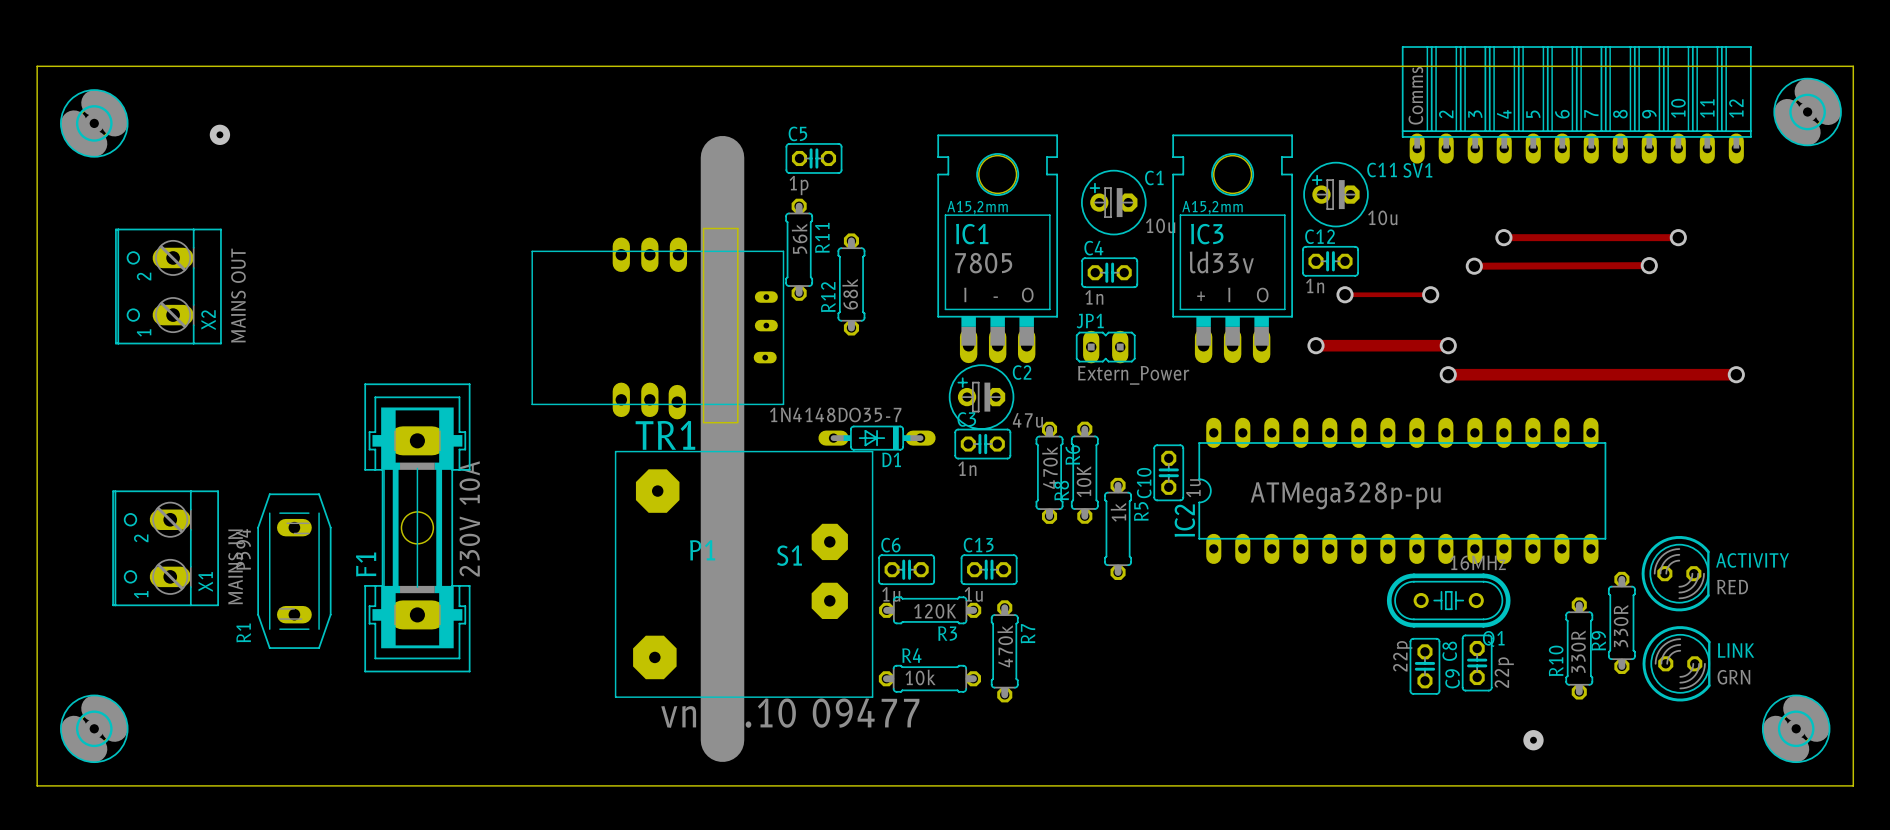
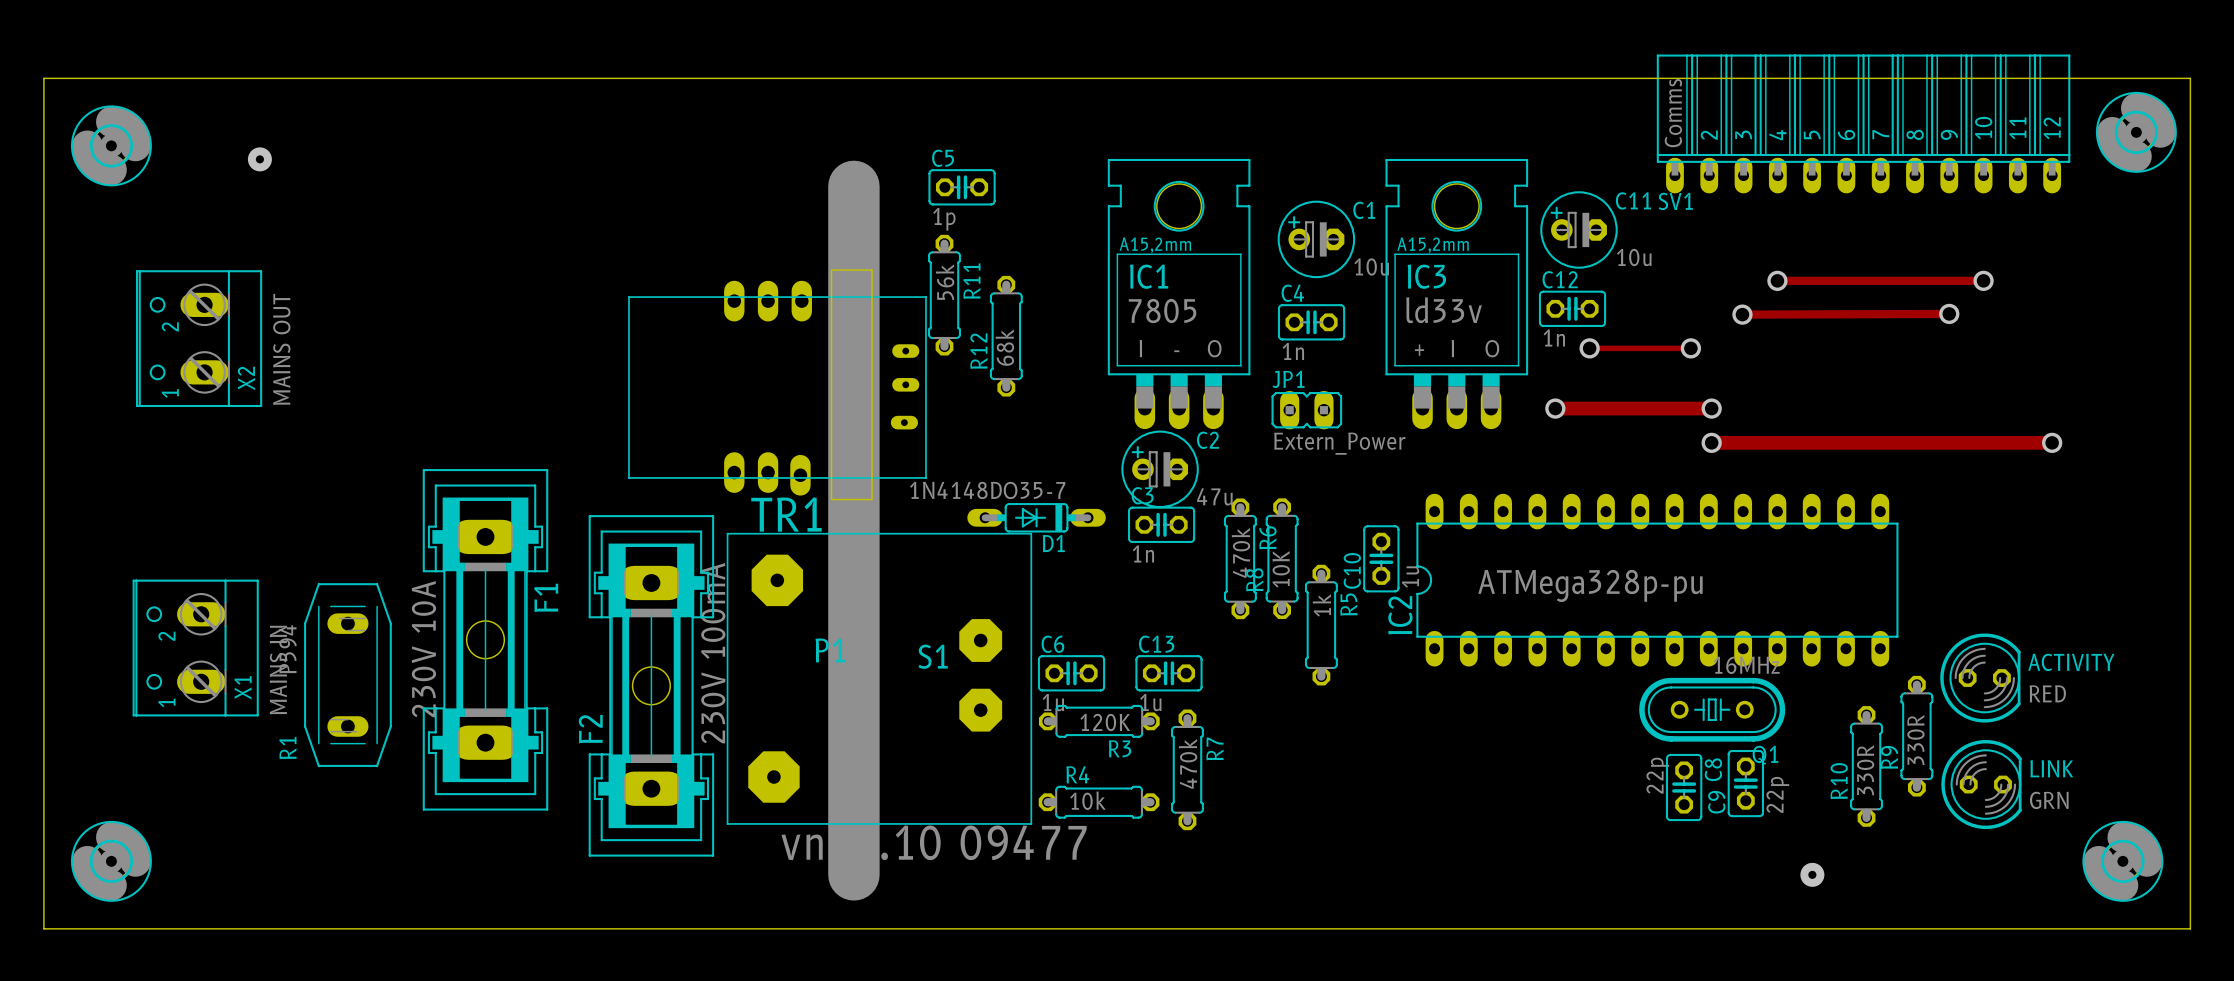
F1 rotation: 0° (417, 527) -> 180° (485, 639)
F2: none -> 230V 100mA (651, 685)

